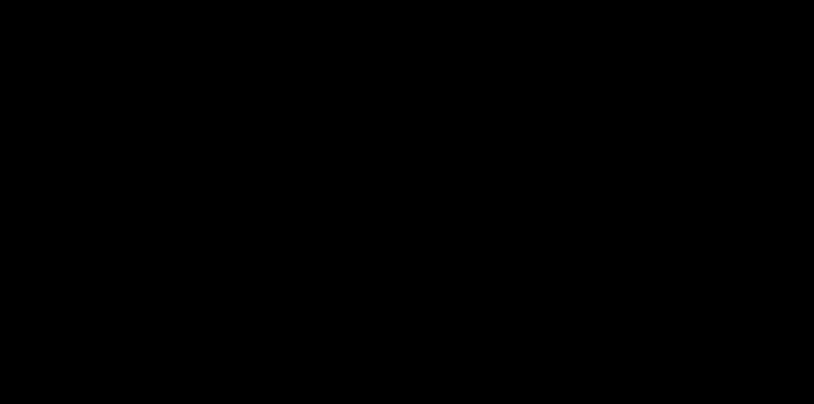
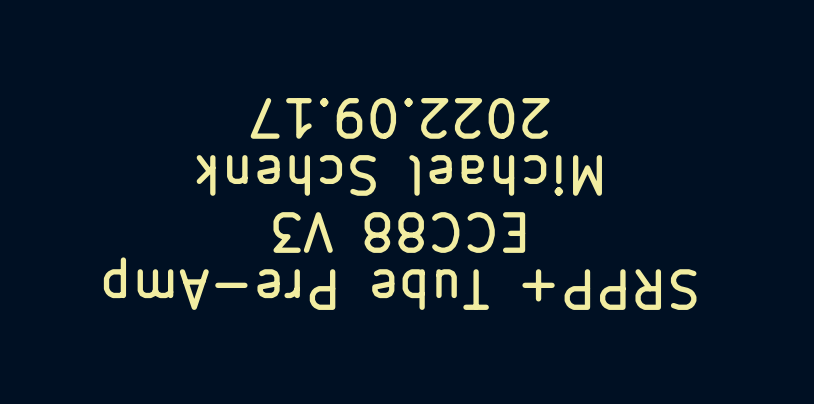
text: none -> 2022.09.17 (400, 118)
text: none -> Michael Schenk (399, 175)
text: none -> ECC88 V3 (399, 232)
text: none -> SRPP+ Tube Pre-Amp (400, 283)

